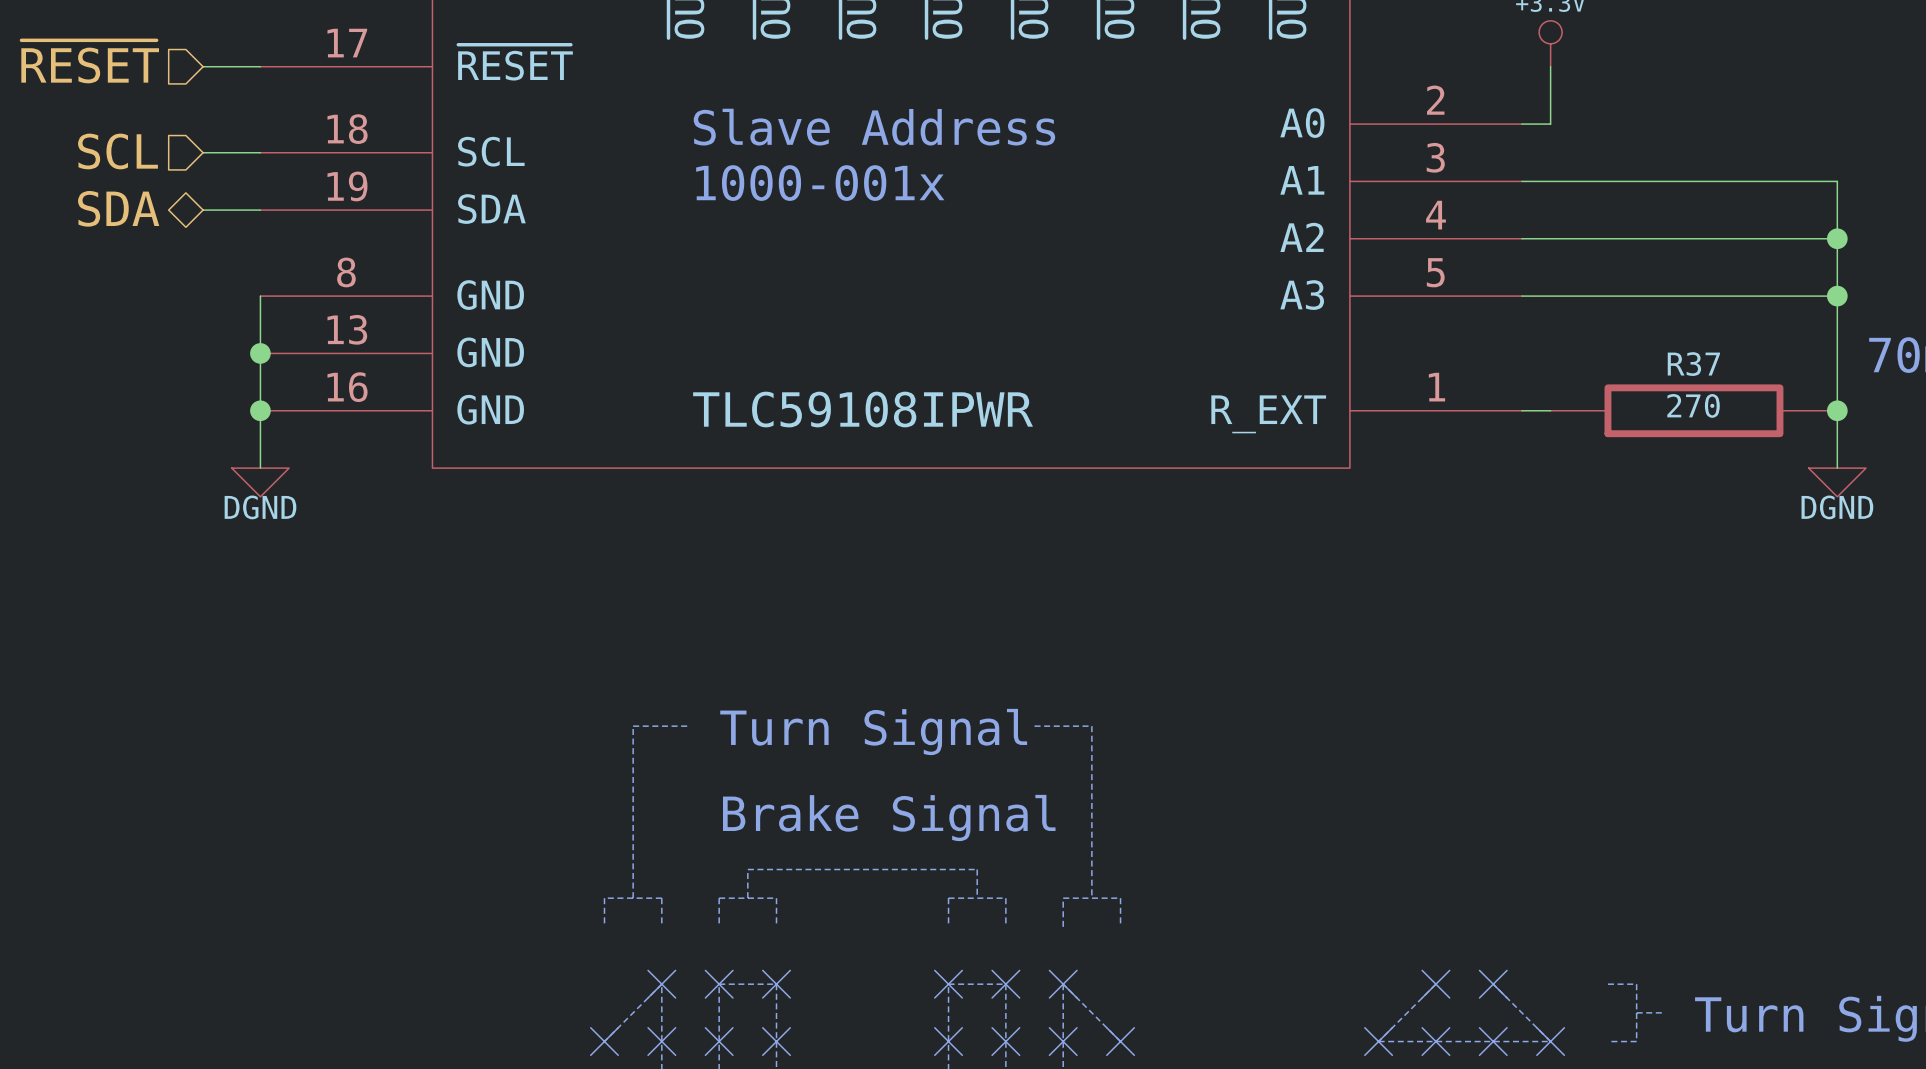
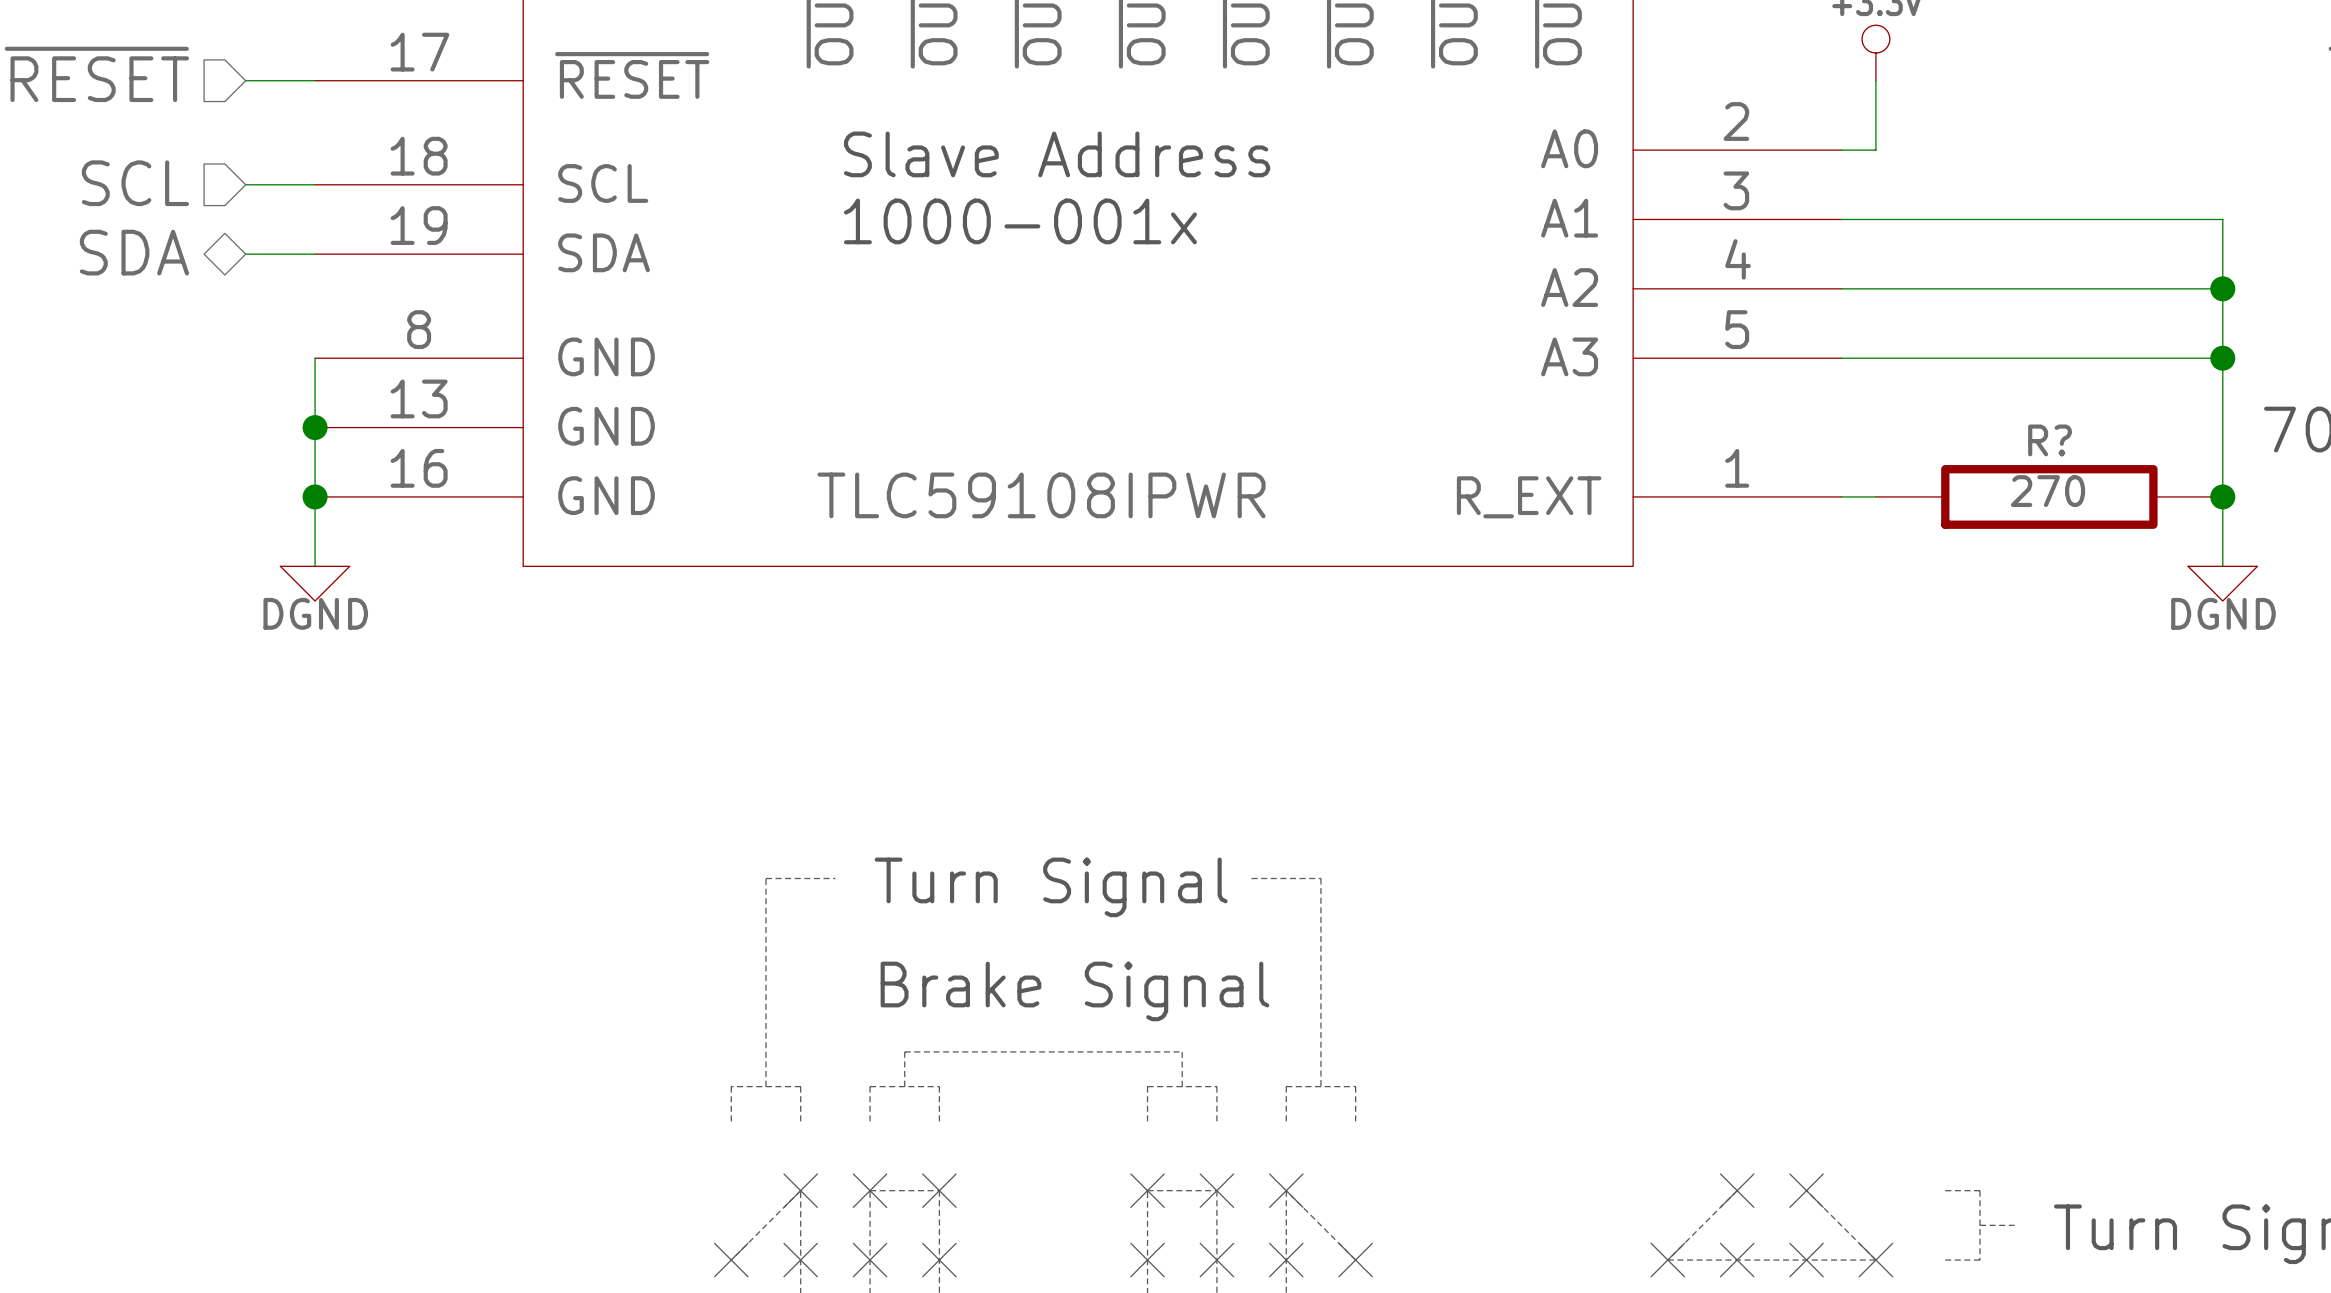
R37 name: R37 (1693, 364) -> R? (2050, 440)

